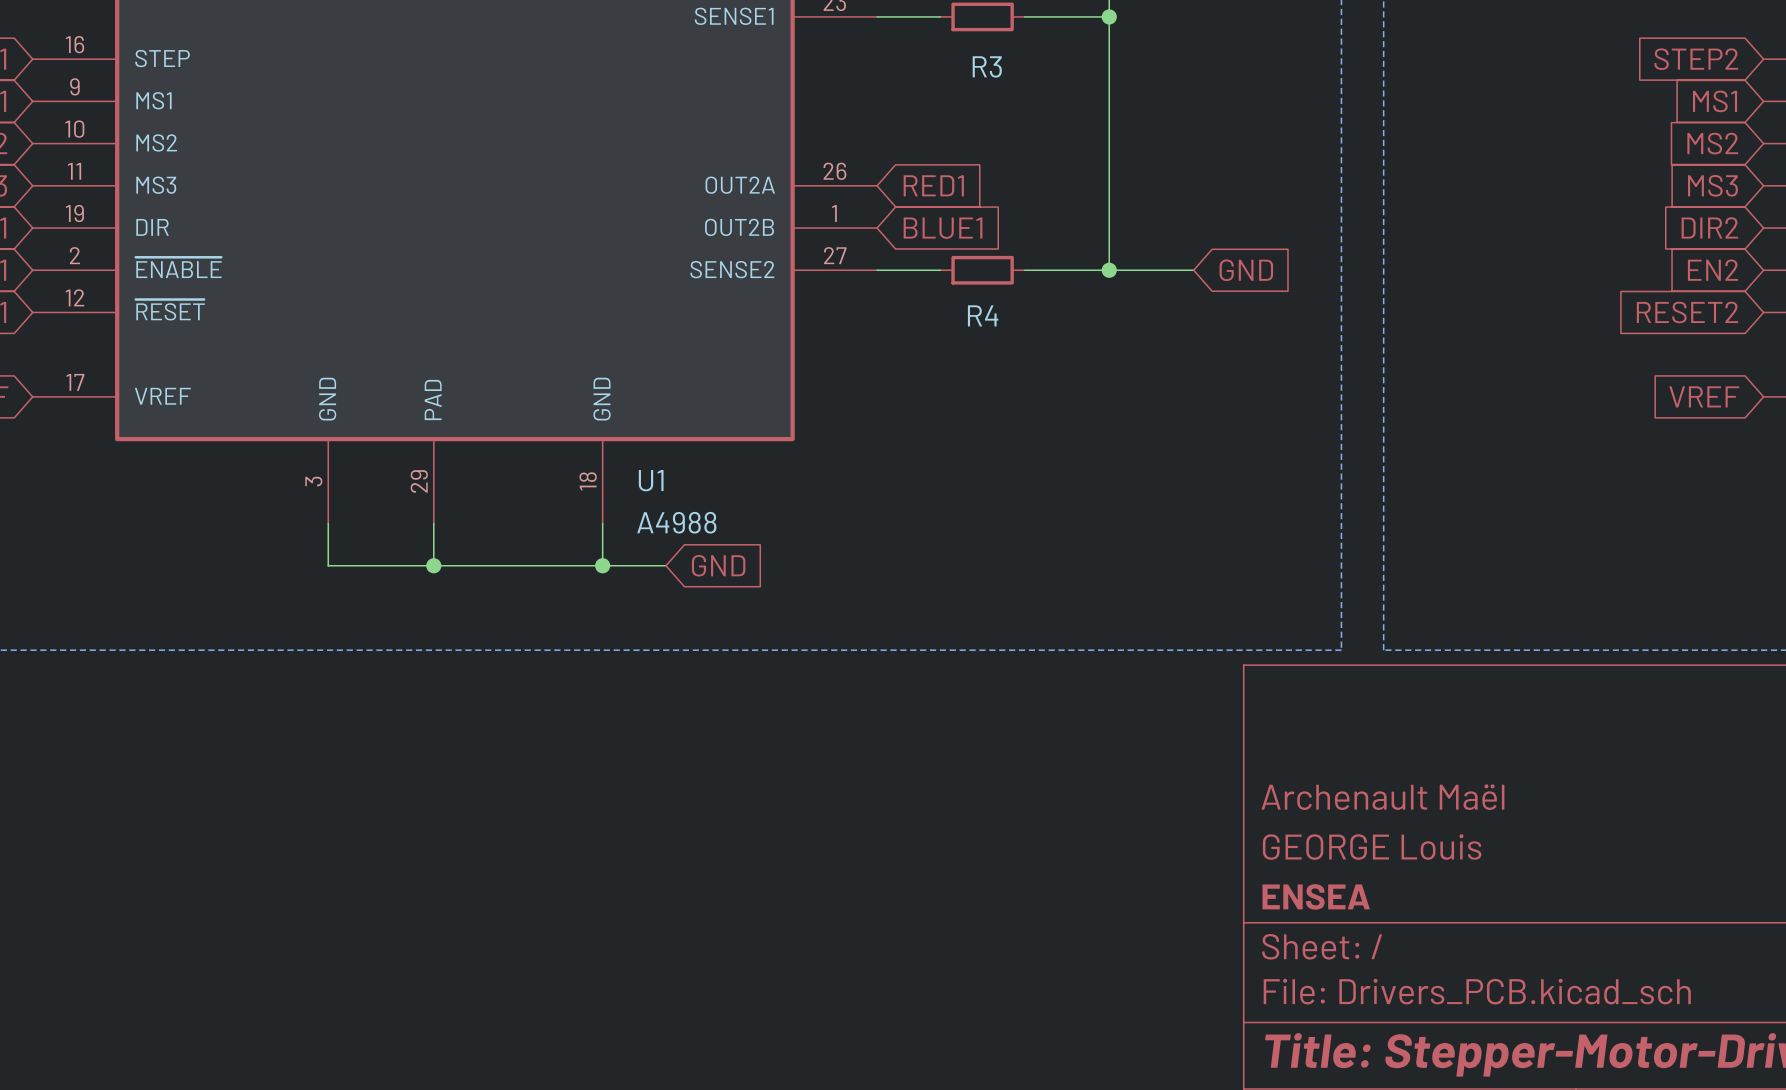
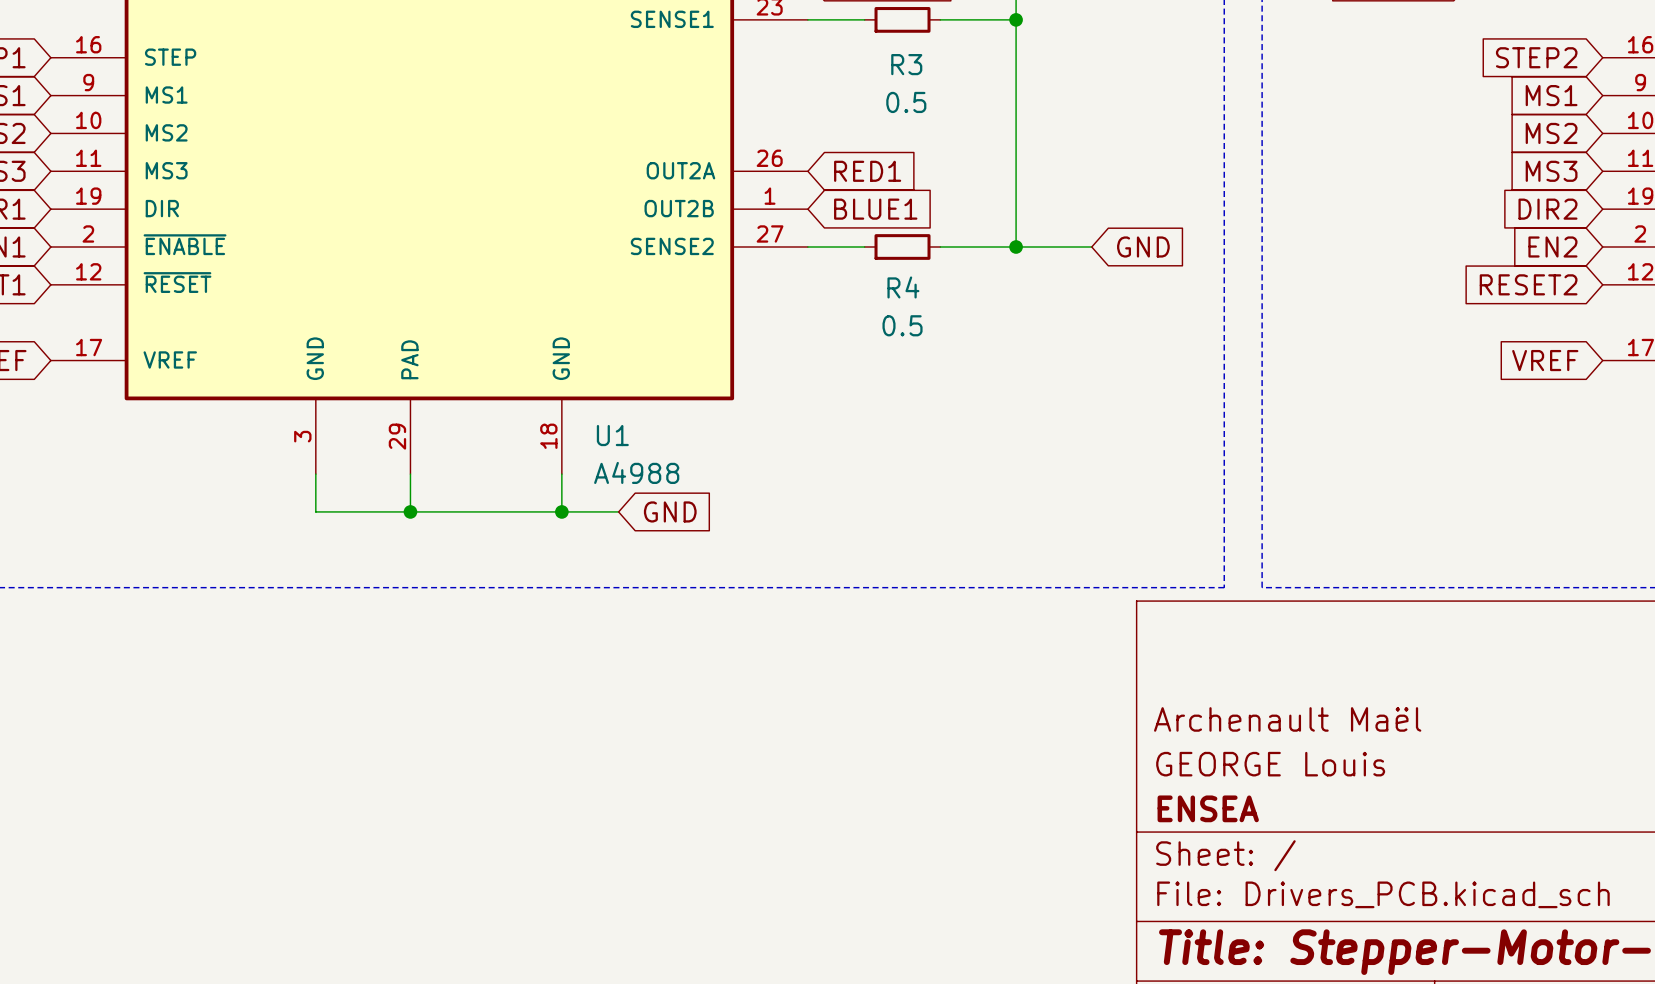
R3 value: none -> 0.5 (906, 102)
R4 value: none -> 0.5 (902, 325)

